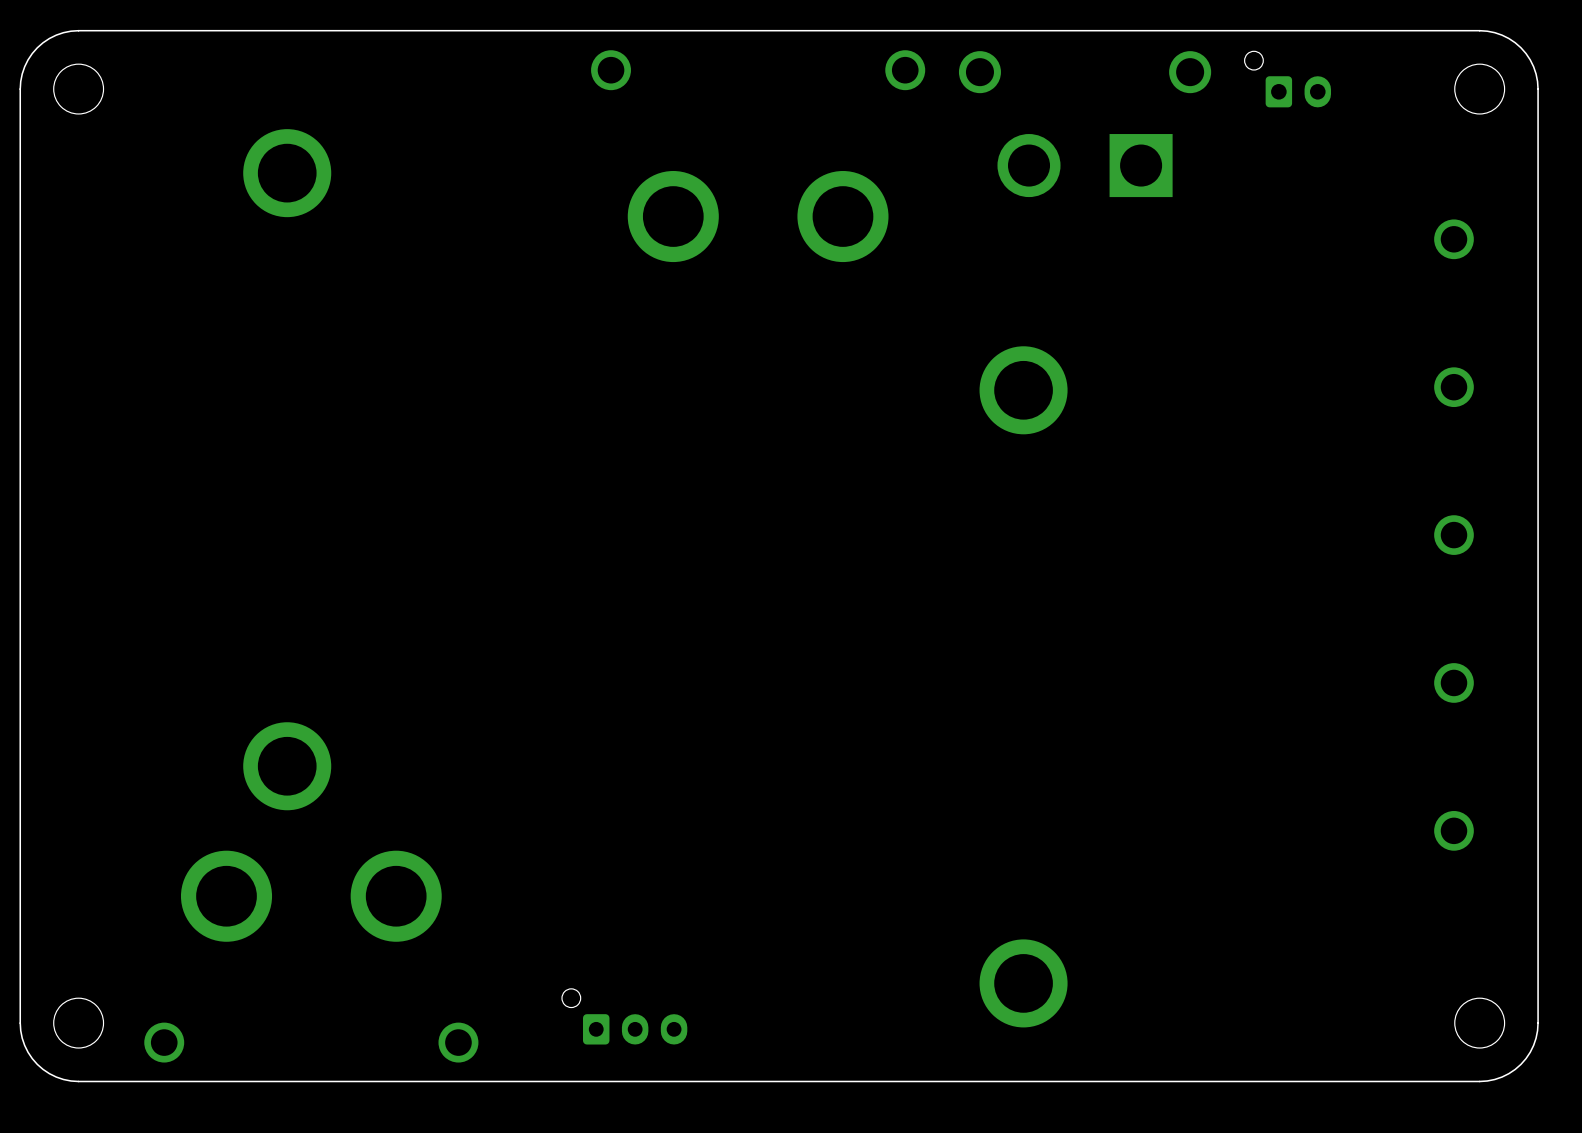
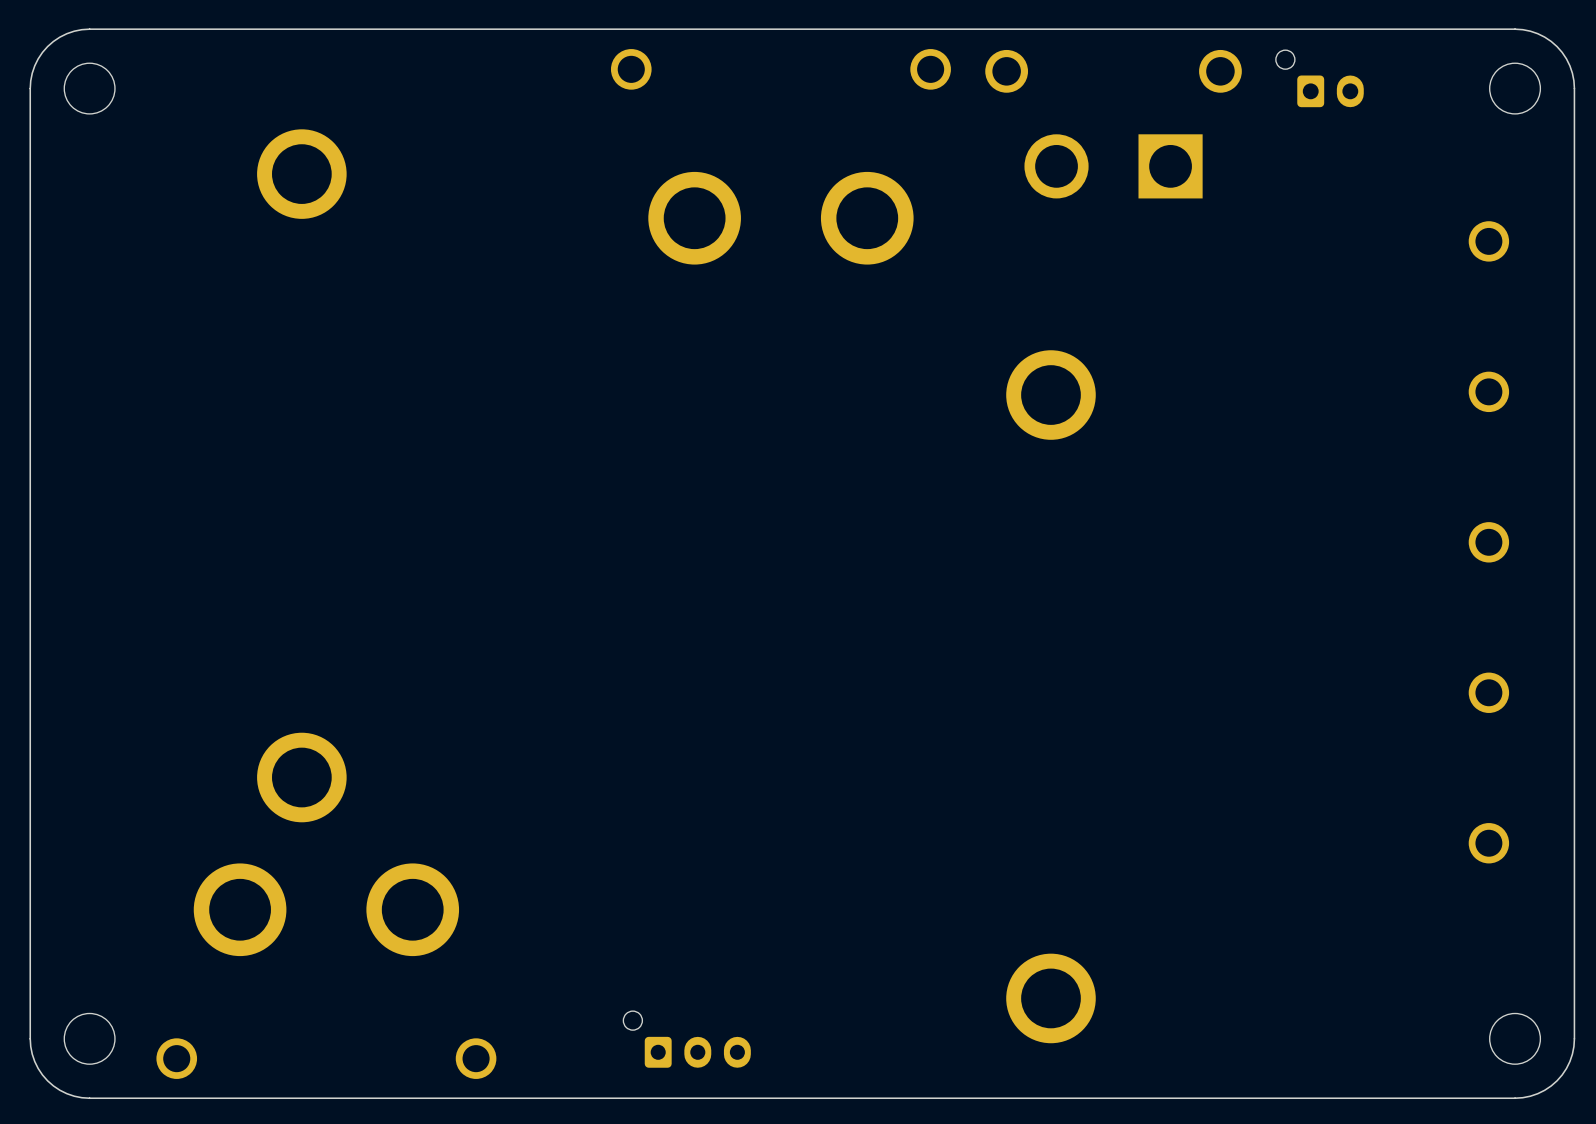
part position: (624, 1016) -> (687, 1039)

